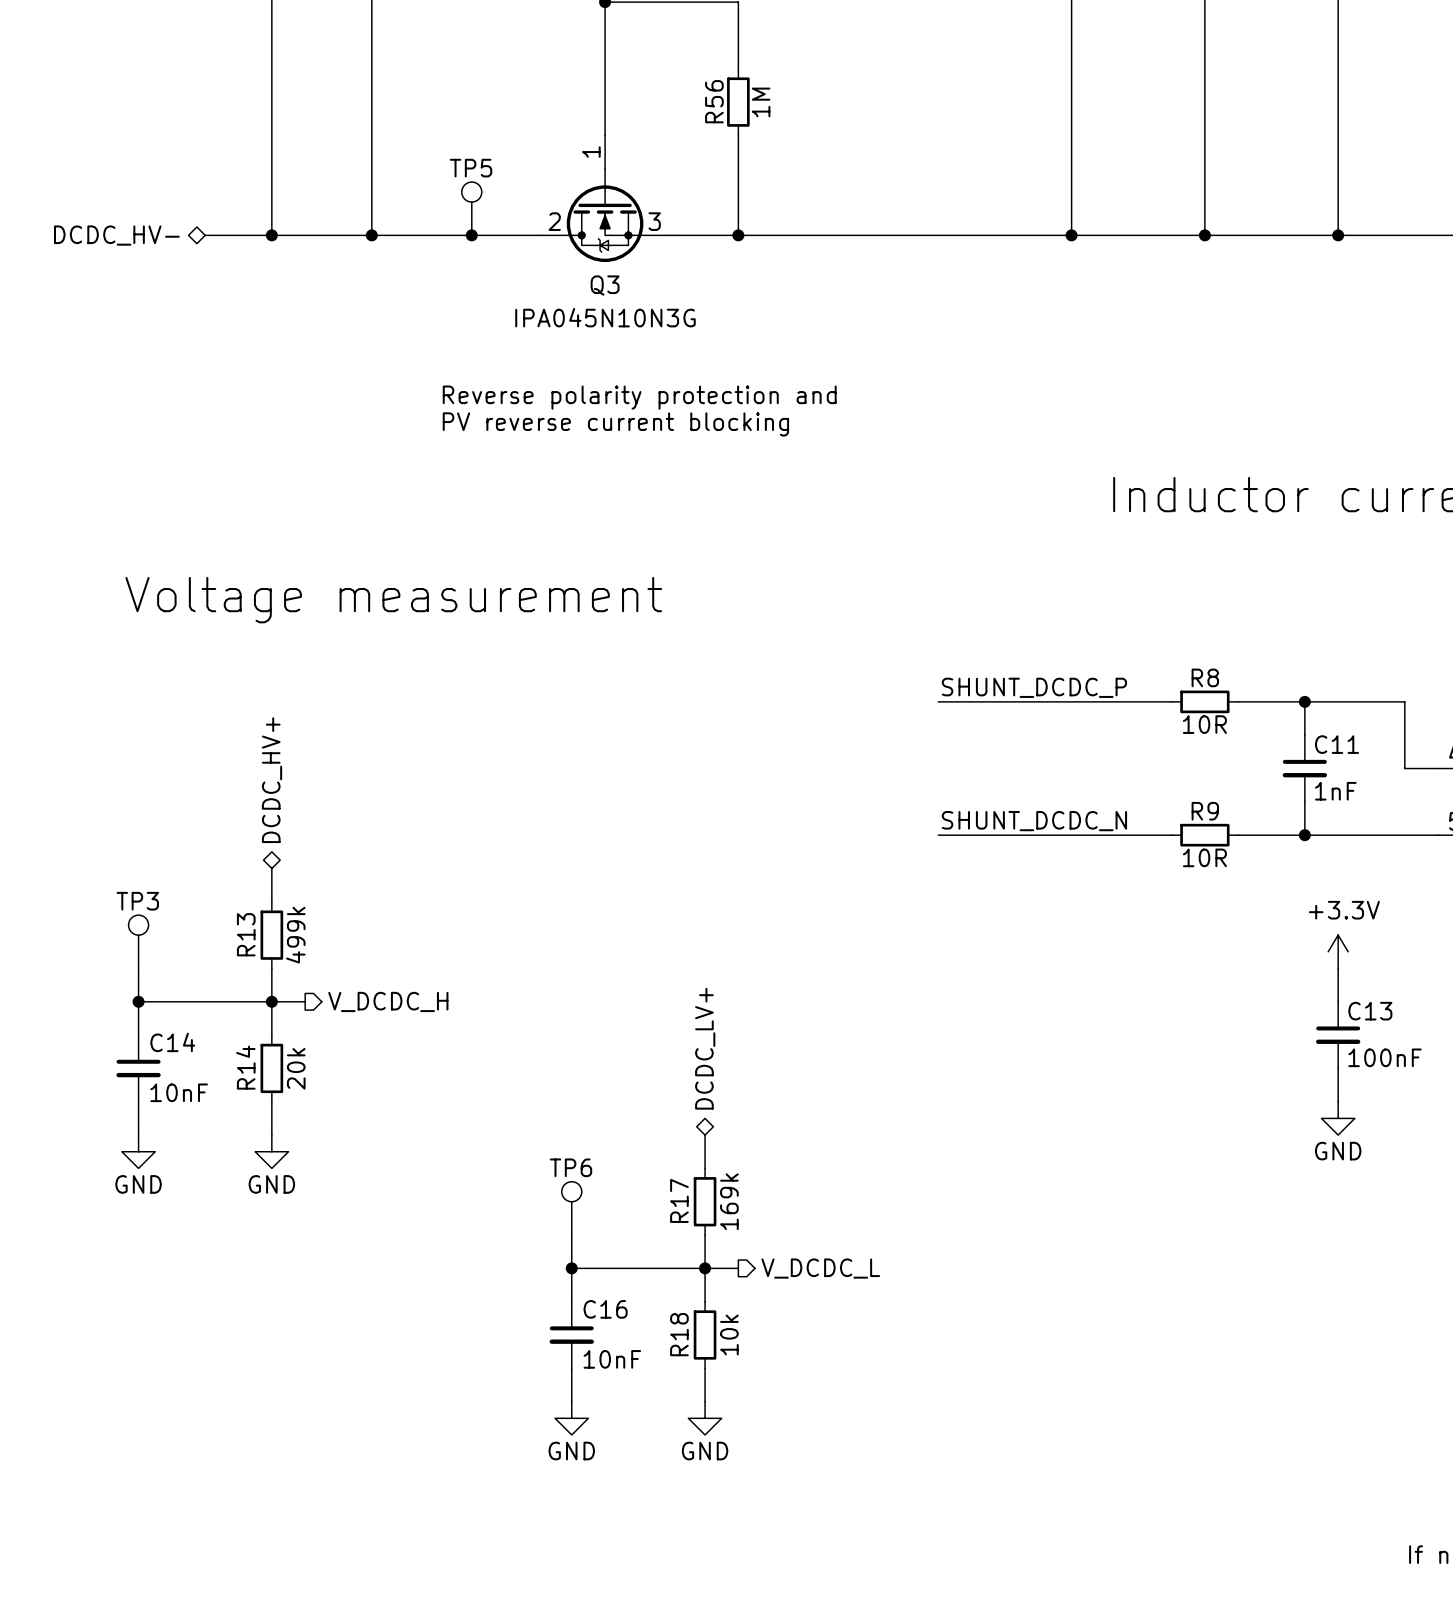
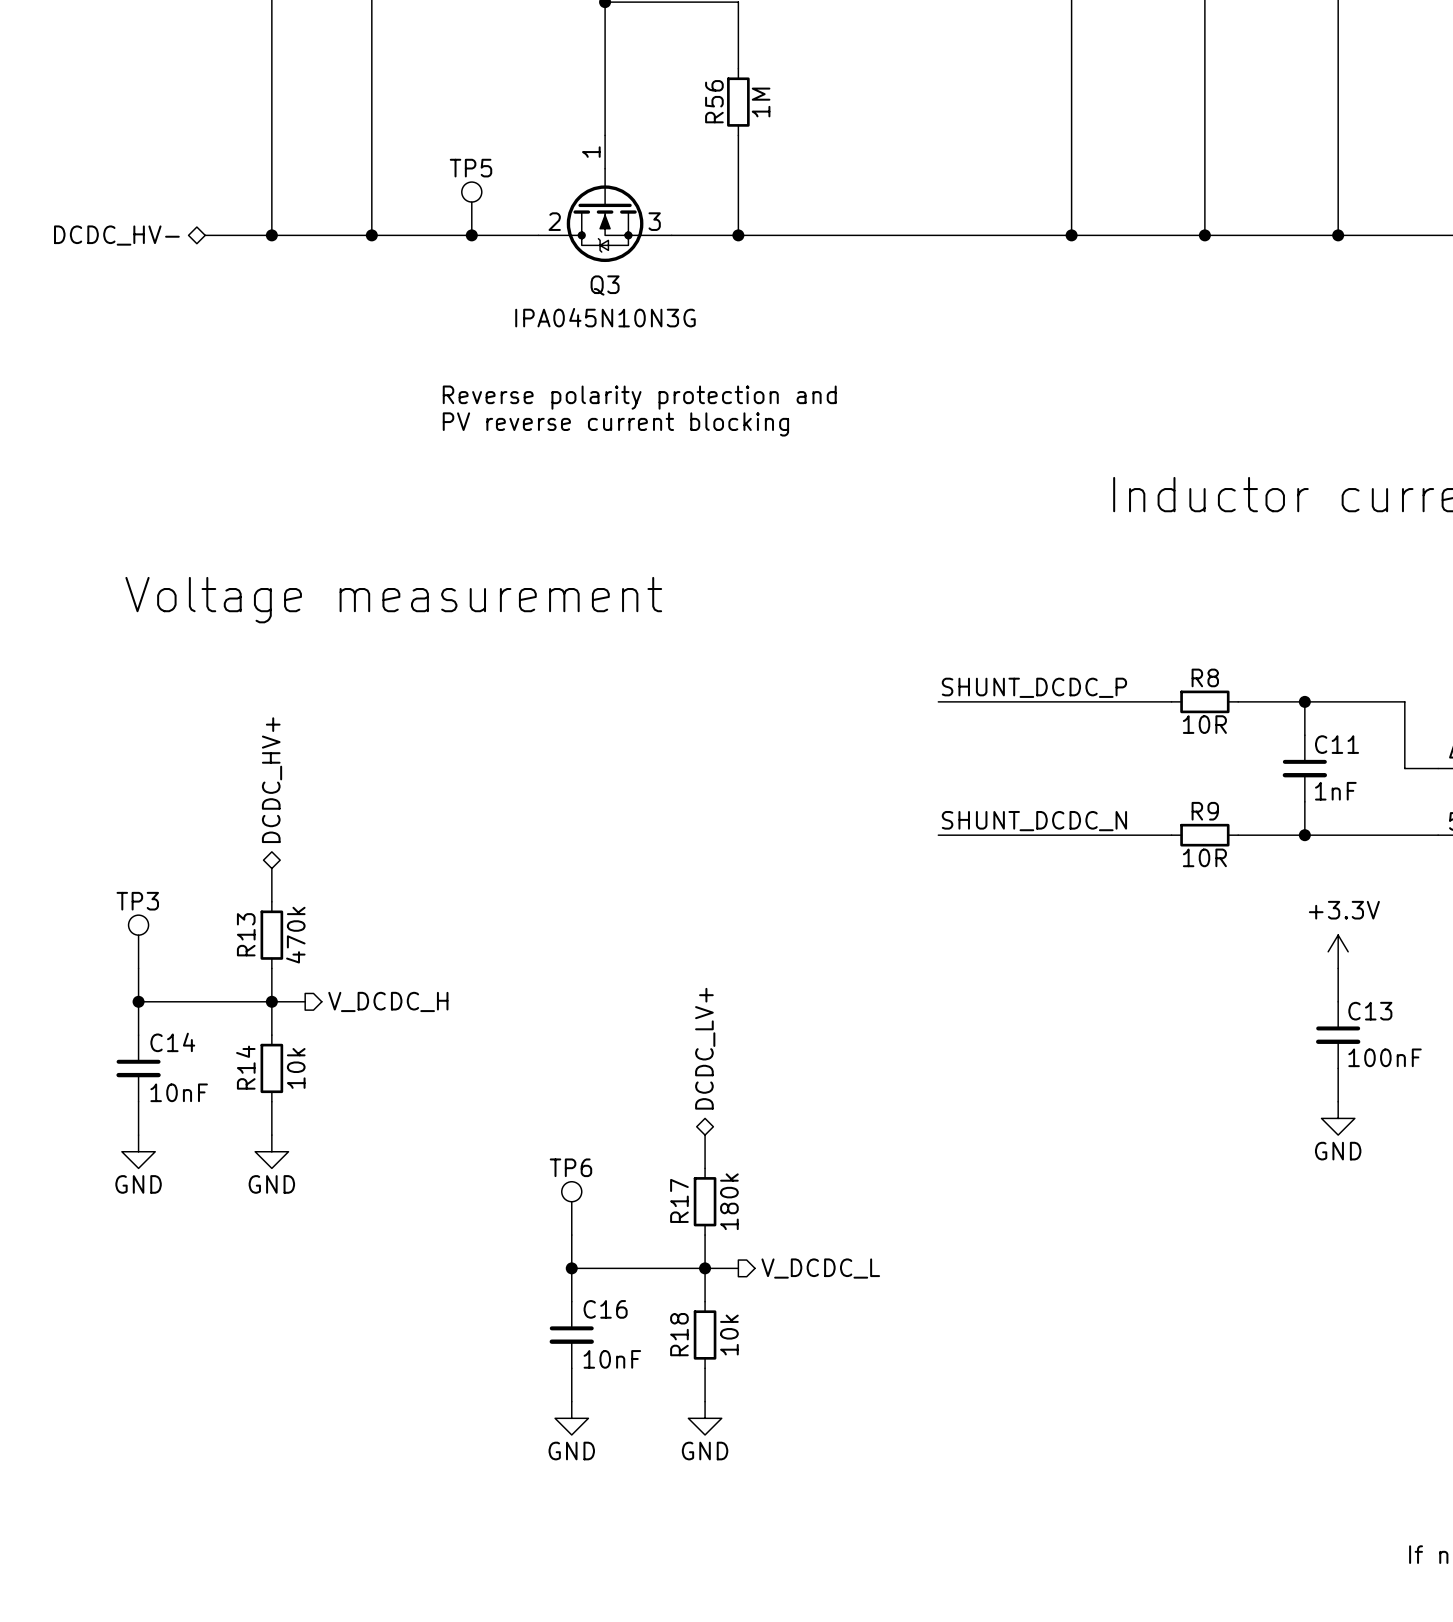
R13 value: 499k (295, 935) -> 470k (295, 935)
R14 value: 20k (296, 1068) -> 10k (296, 1068)
R17 value: 169k (729, 1201) -> 180k (729, 1201)

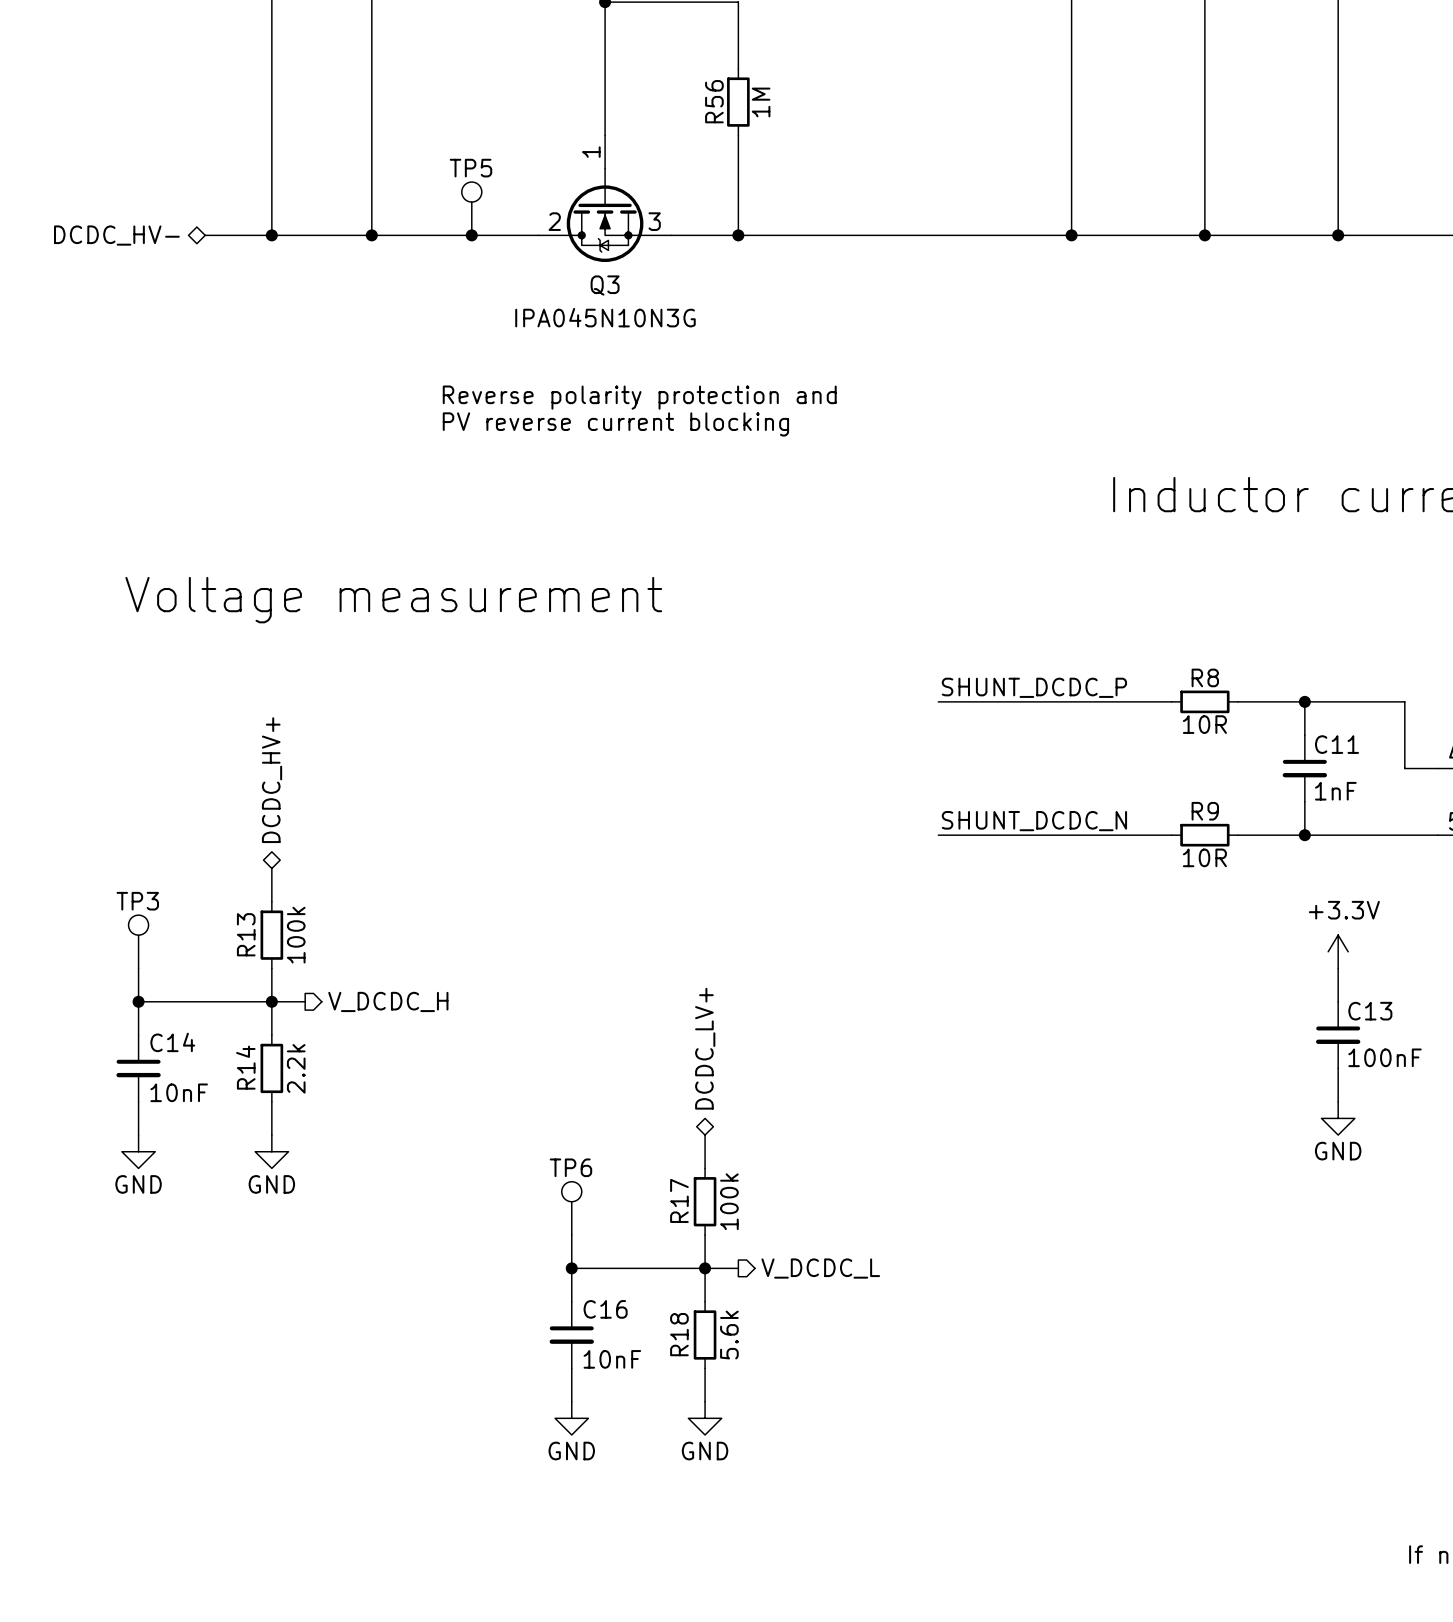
R13 value: 470k (295, 935) -> 100k (296, 935)
R14 value: 10k (296, 1068) -> 2.2k (296, 1068)
R17 value: 180k (729, 1201) -> 100k (729, 1201)
R18 value: 10k (729, 1335) -> 5.6k (729, 1335)

